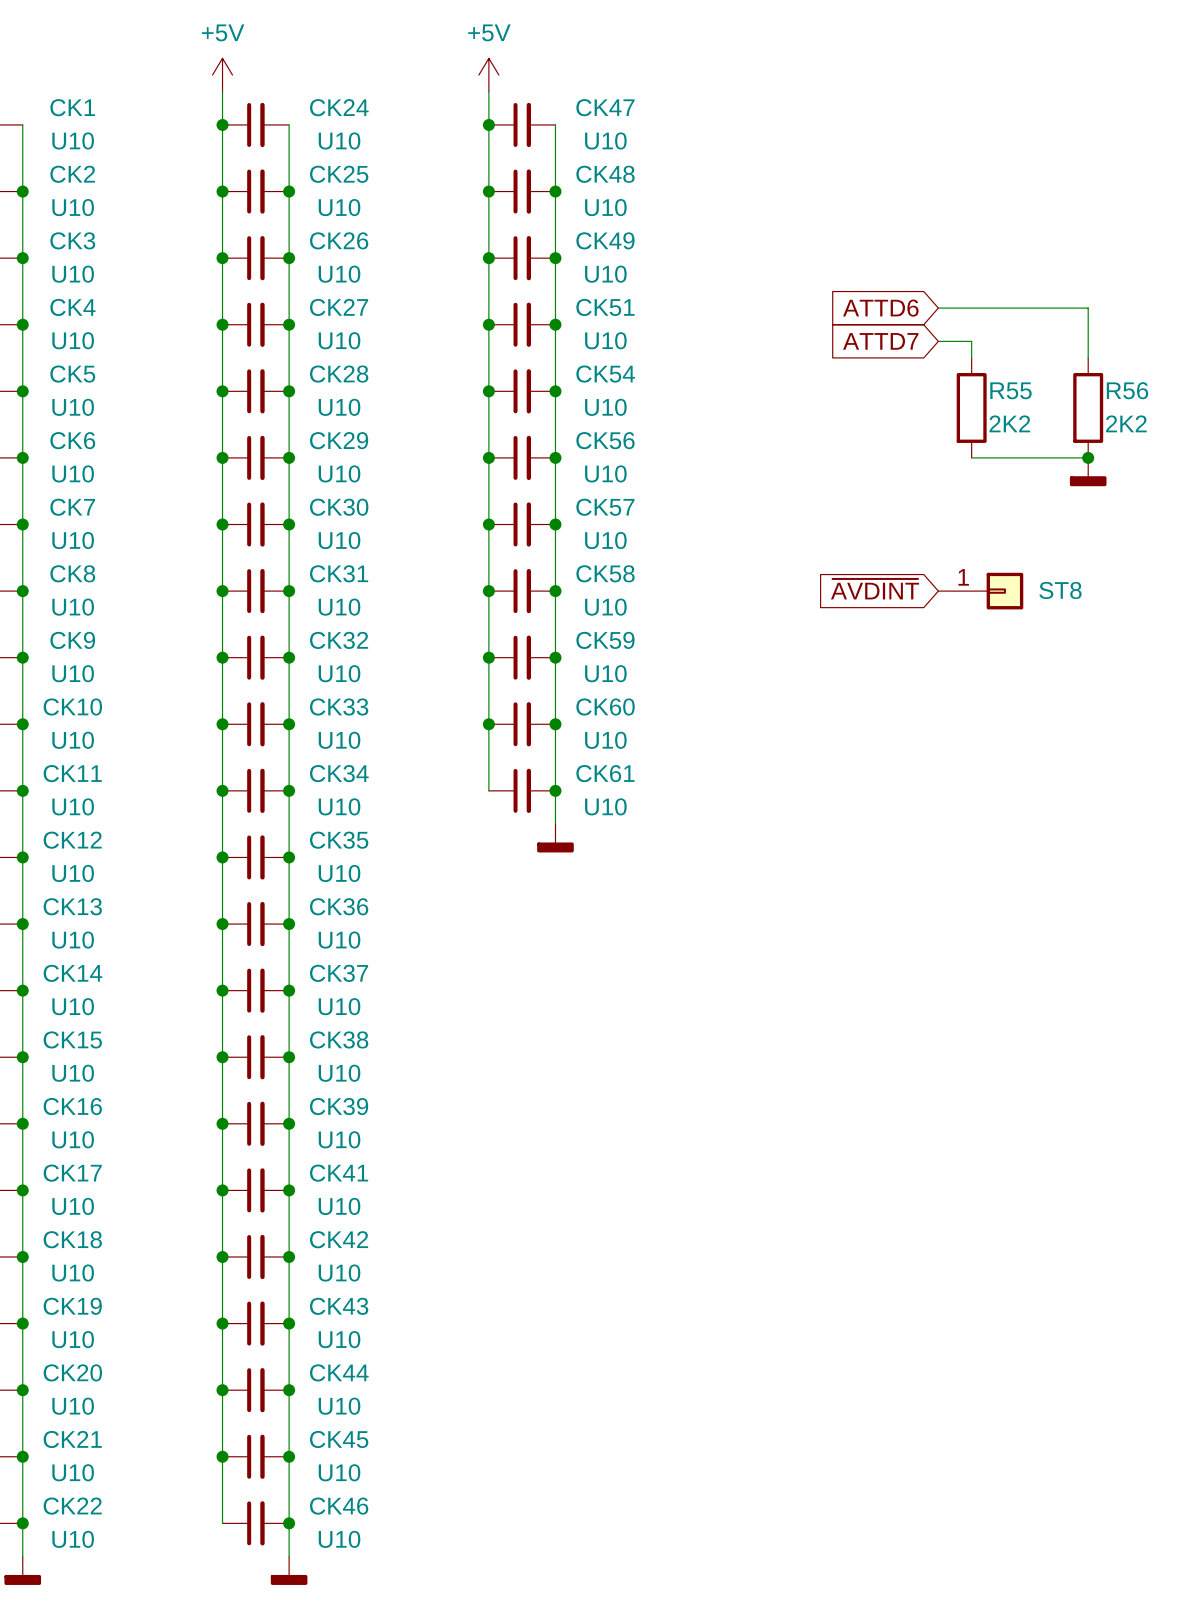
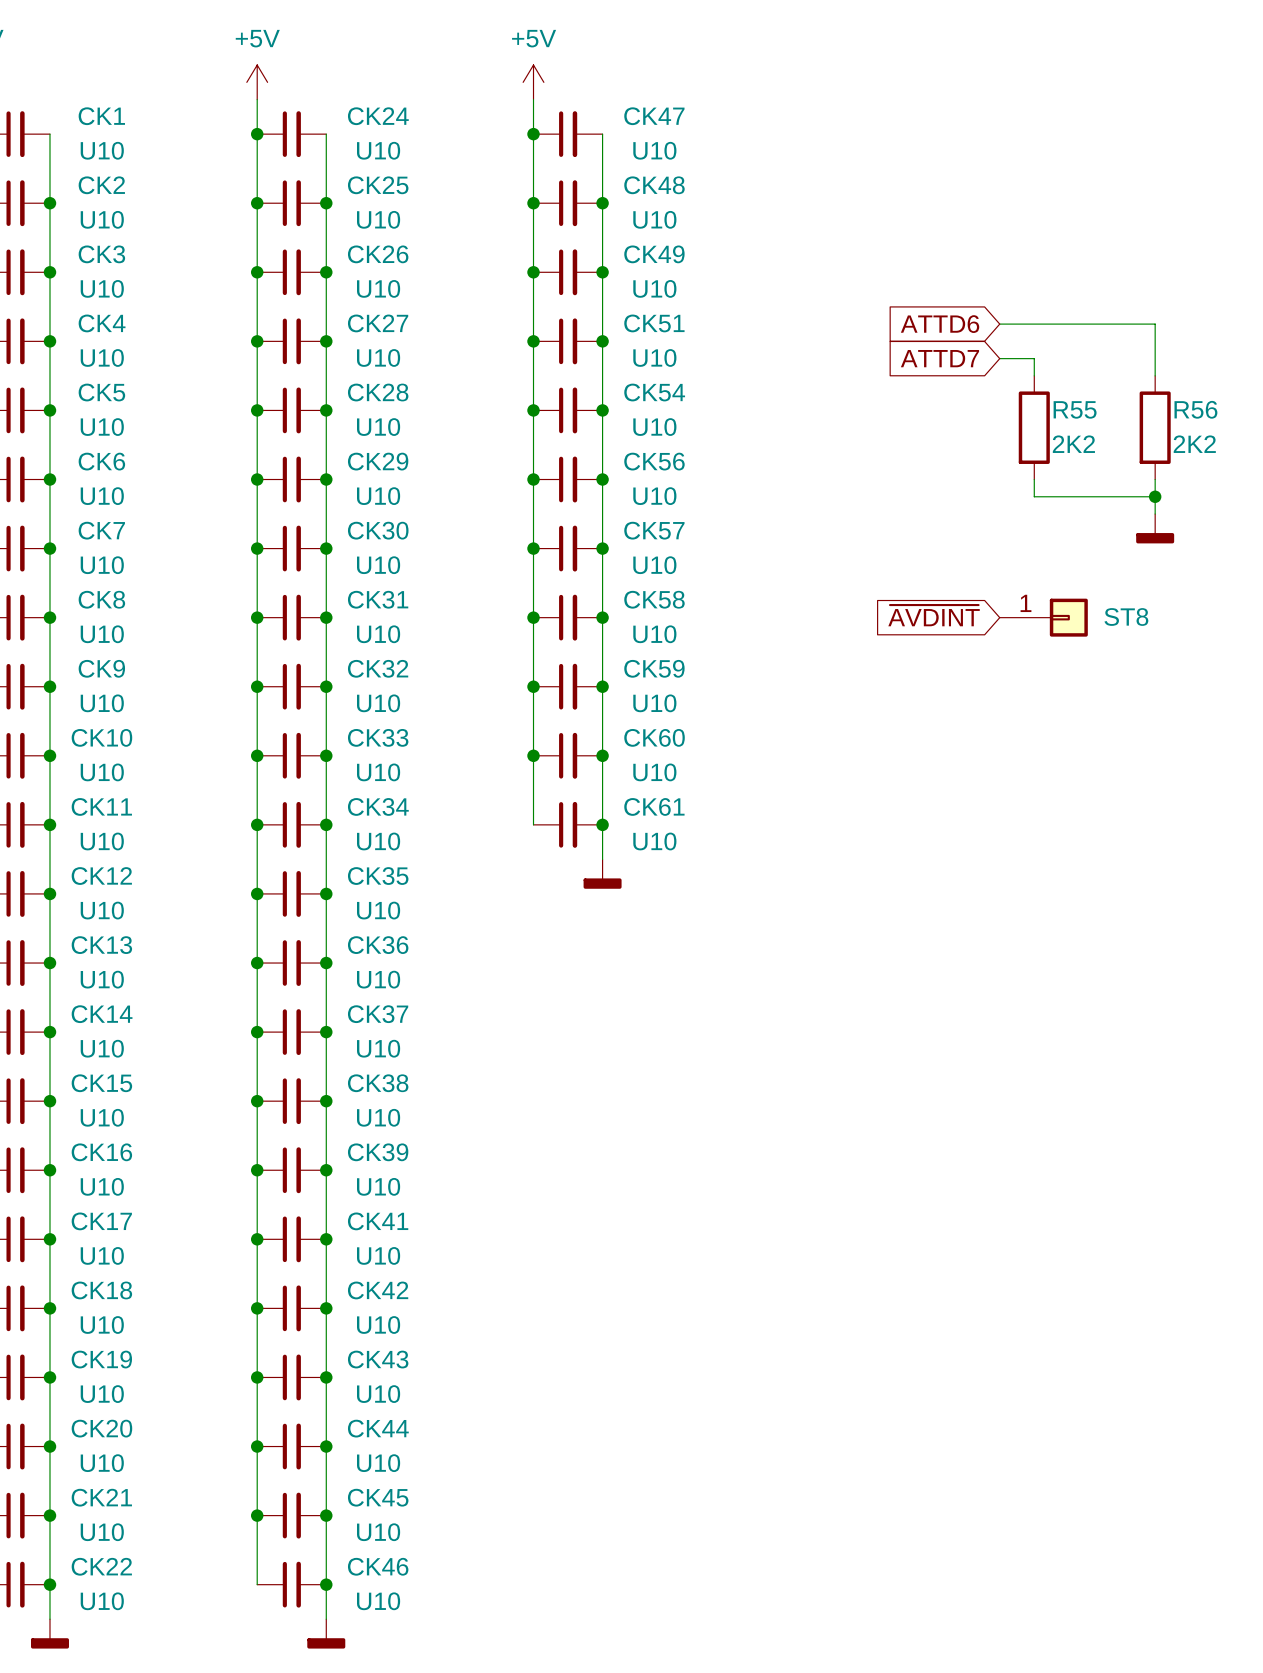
wire: (971, 457) (1088, 457) -> (1034, 479) (1034, 496) (1155, 496)
junction position: (1088, 457) -> (1155, 496)
power symbol position: (1088, 472) -> (1155, 528)

